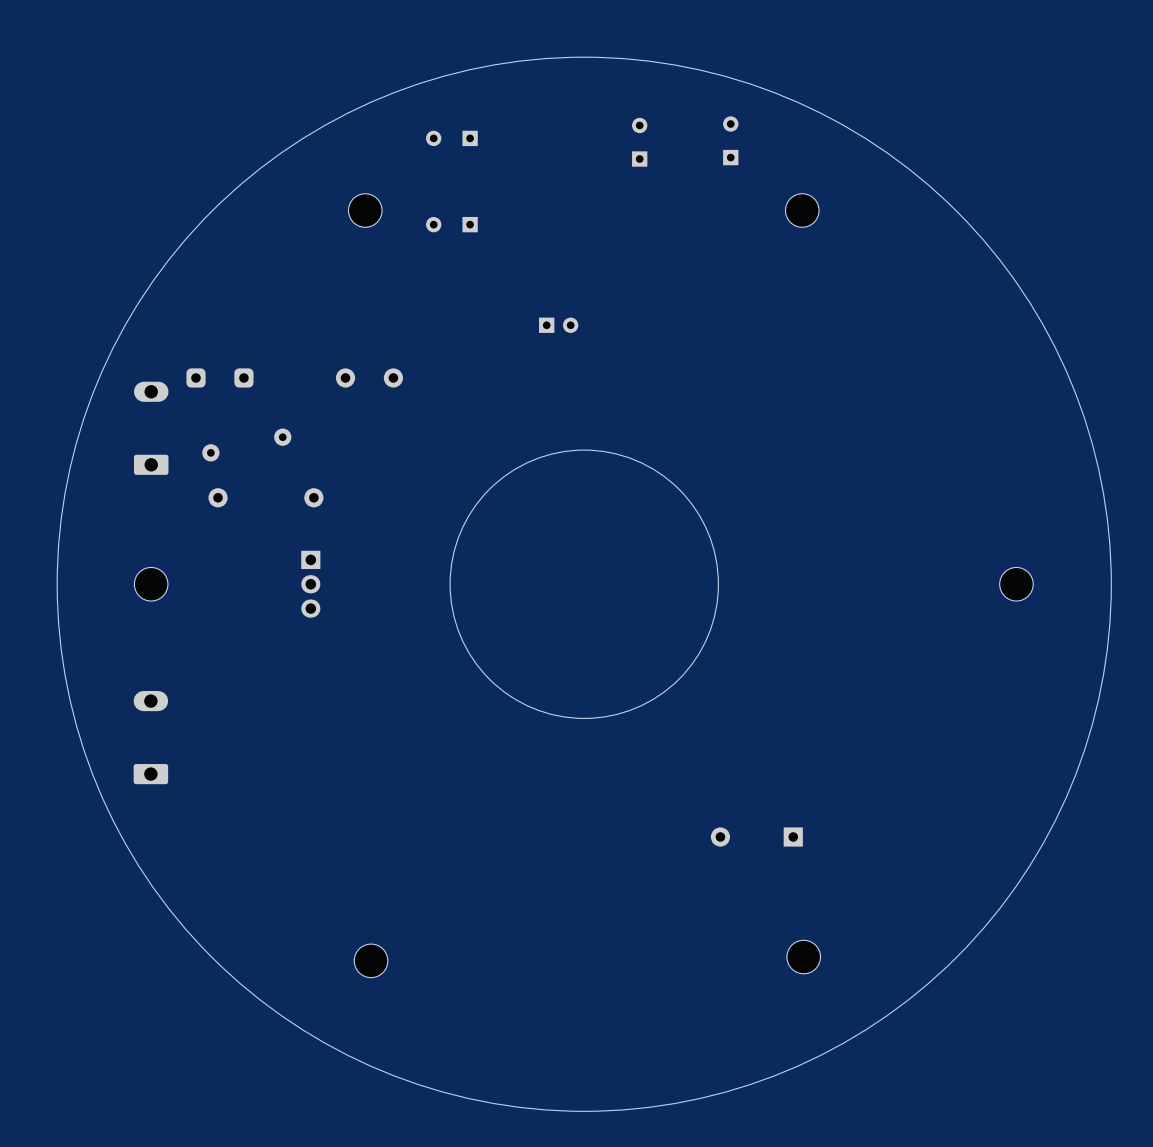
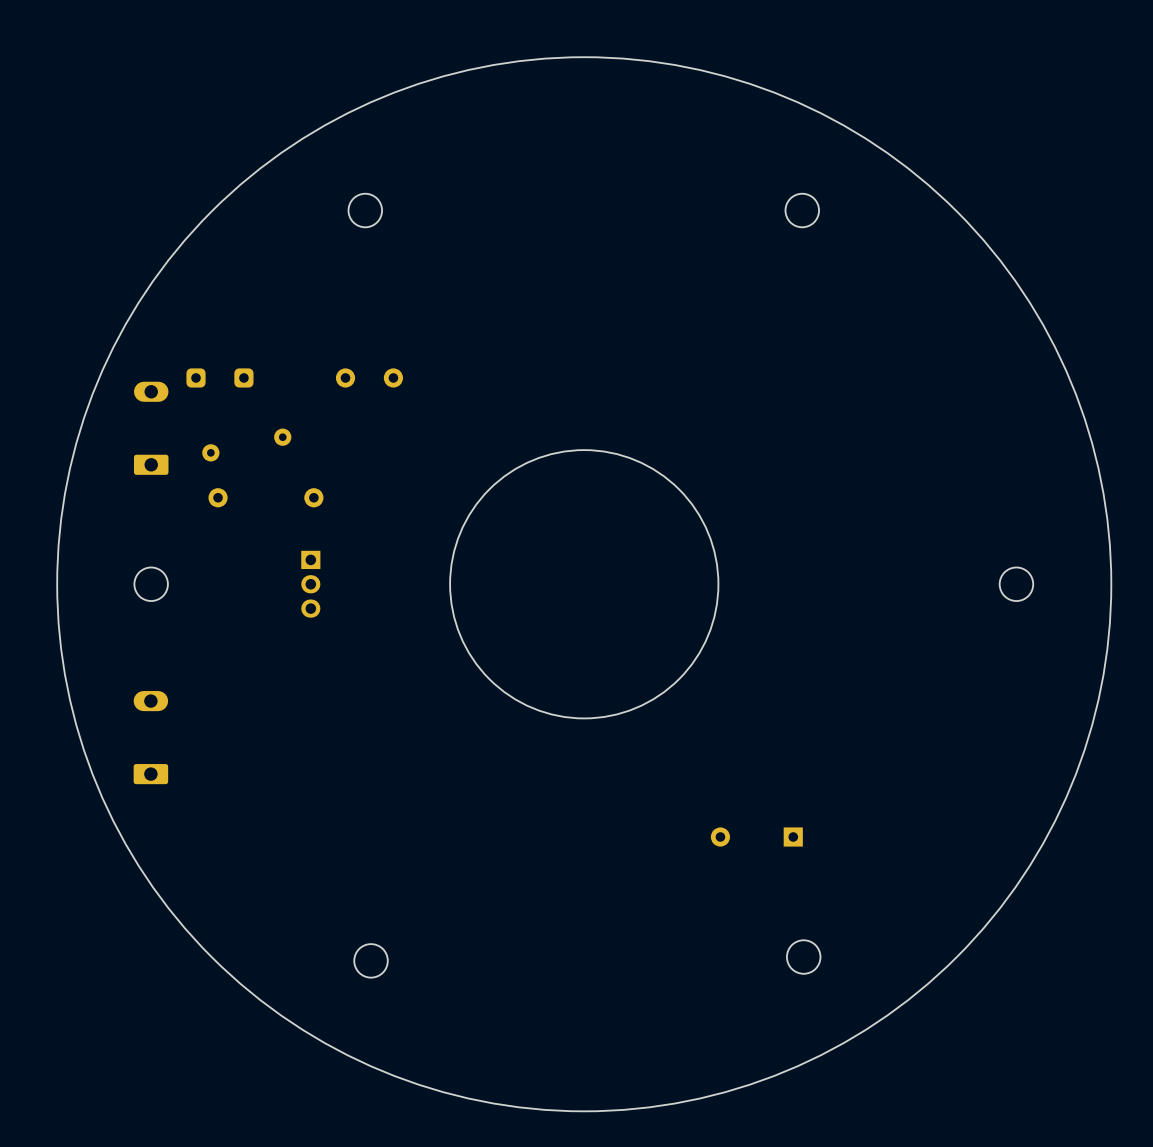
part: (451, 138) -> none
part: (730, 140) -> none
part: (639, 142) -> none
part: (451, 224) -> none
part: (558, 325) -> none

